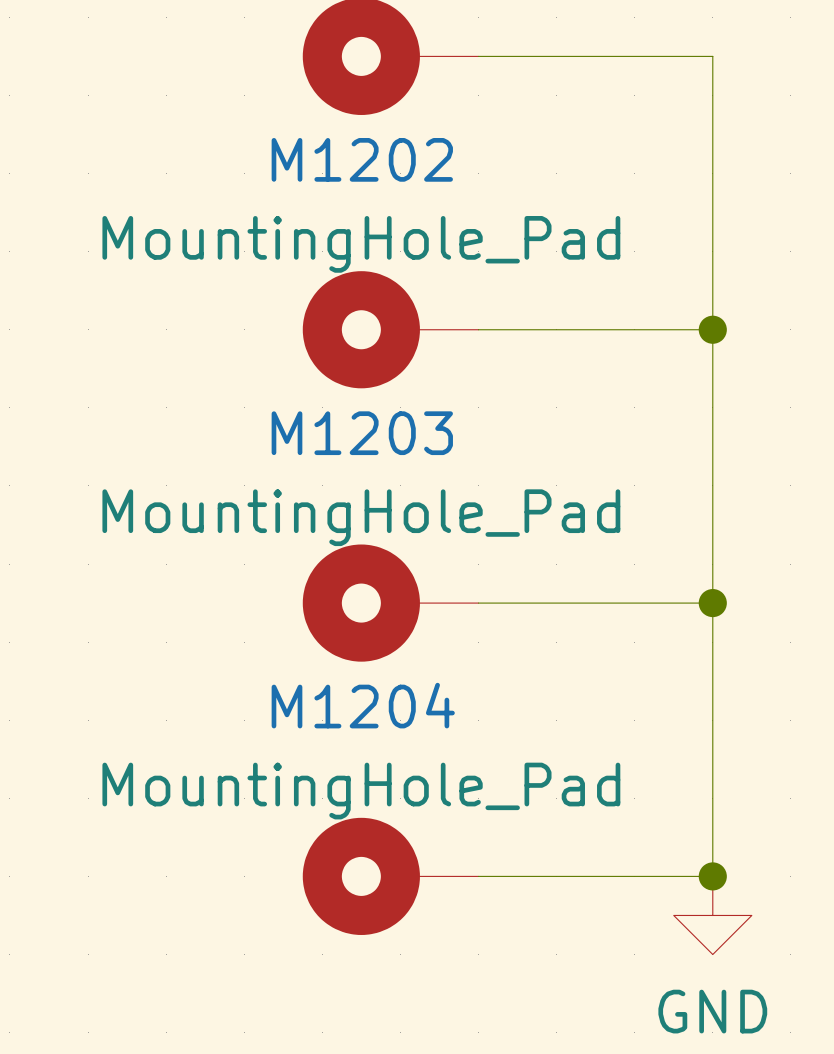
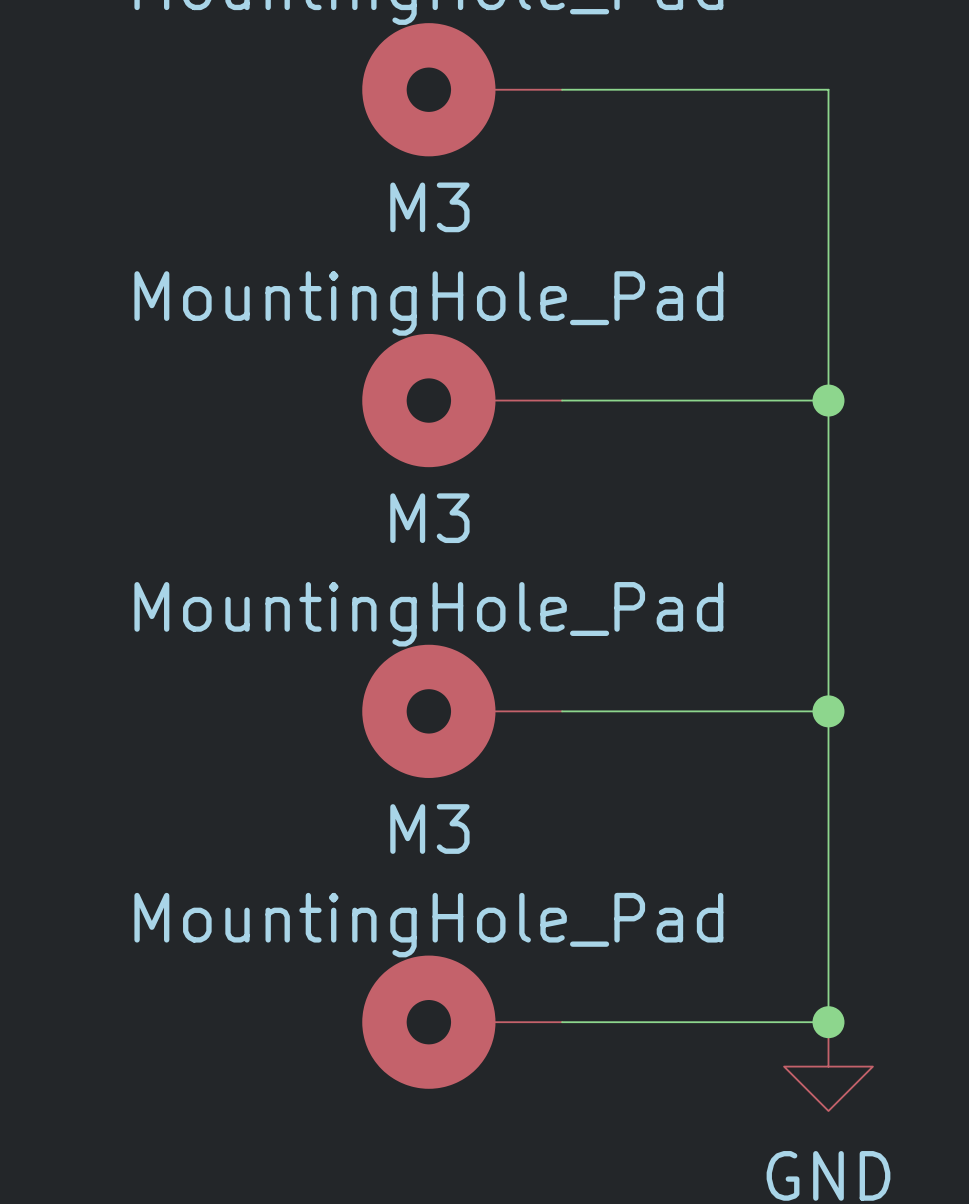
M1202 name: M1202 (362, 159) -> M3 (429, 207)
M1203 name: M1203 (362, 433) -> M3 (429, 518)
M1204 name: M1204 (363, 705) -> M3 (429, 829)

